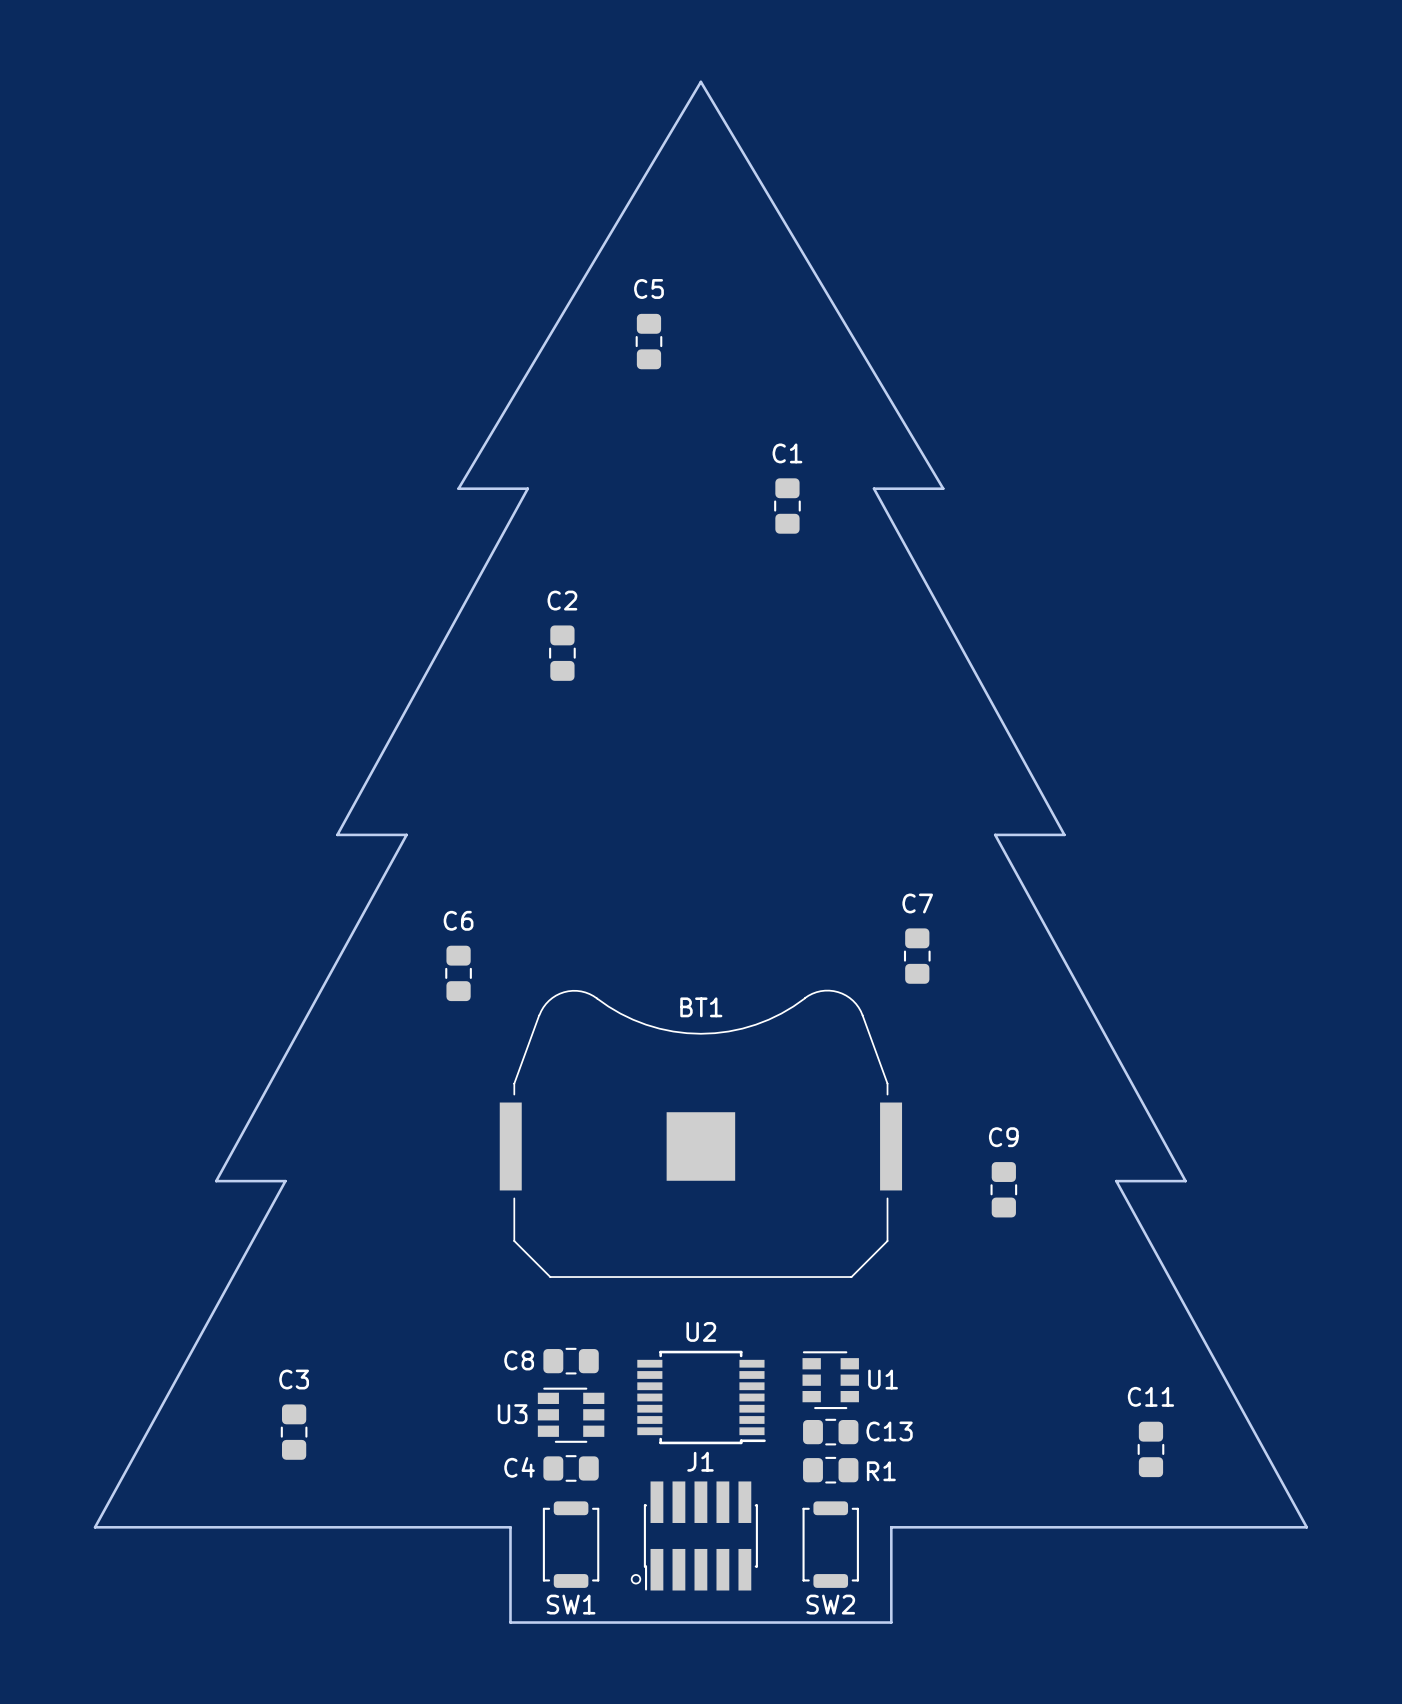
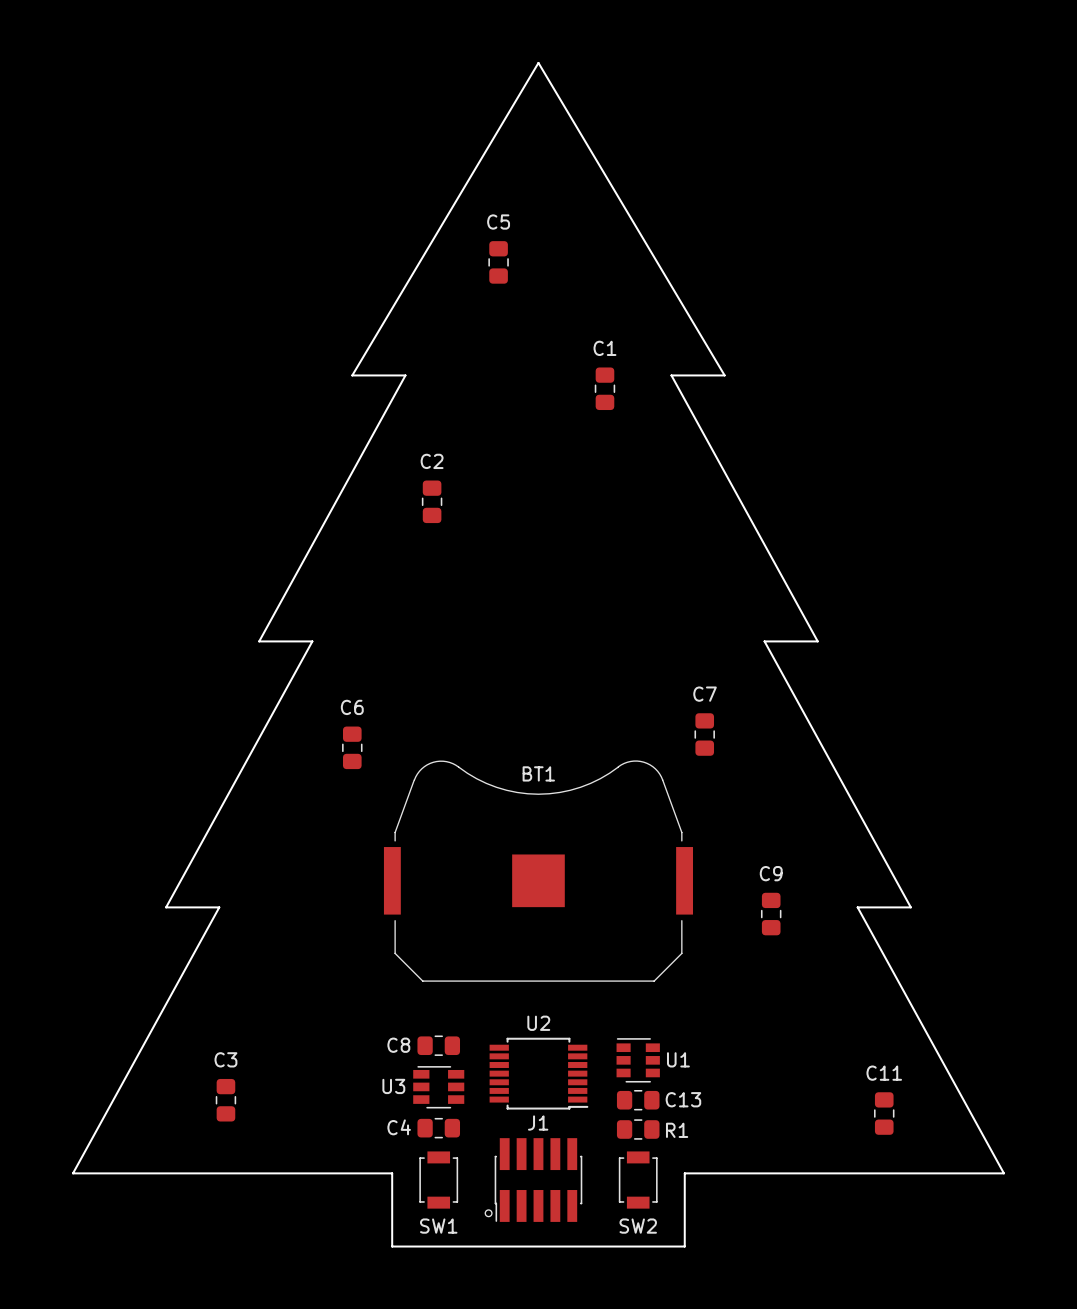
SW1 footprint: [542, 1501, 600, 1588] -> [419, 1151, 459, 1209]
SW2 footprint: [802, 1501, 859, 1588] -> [618, 1151, 658, 1209]

